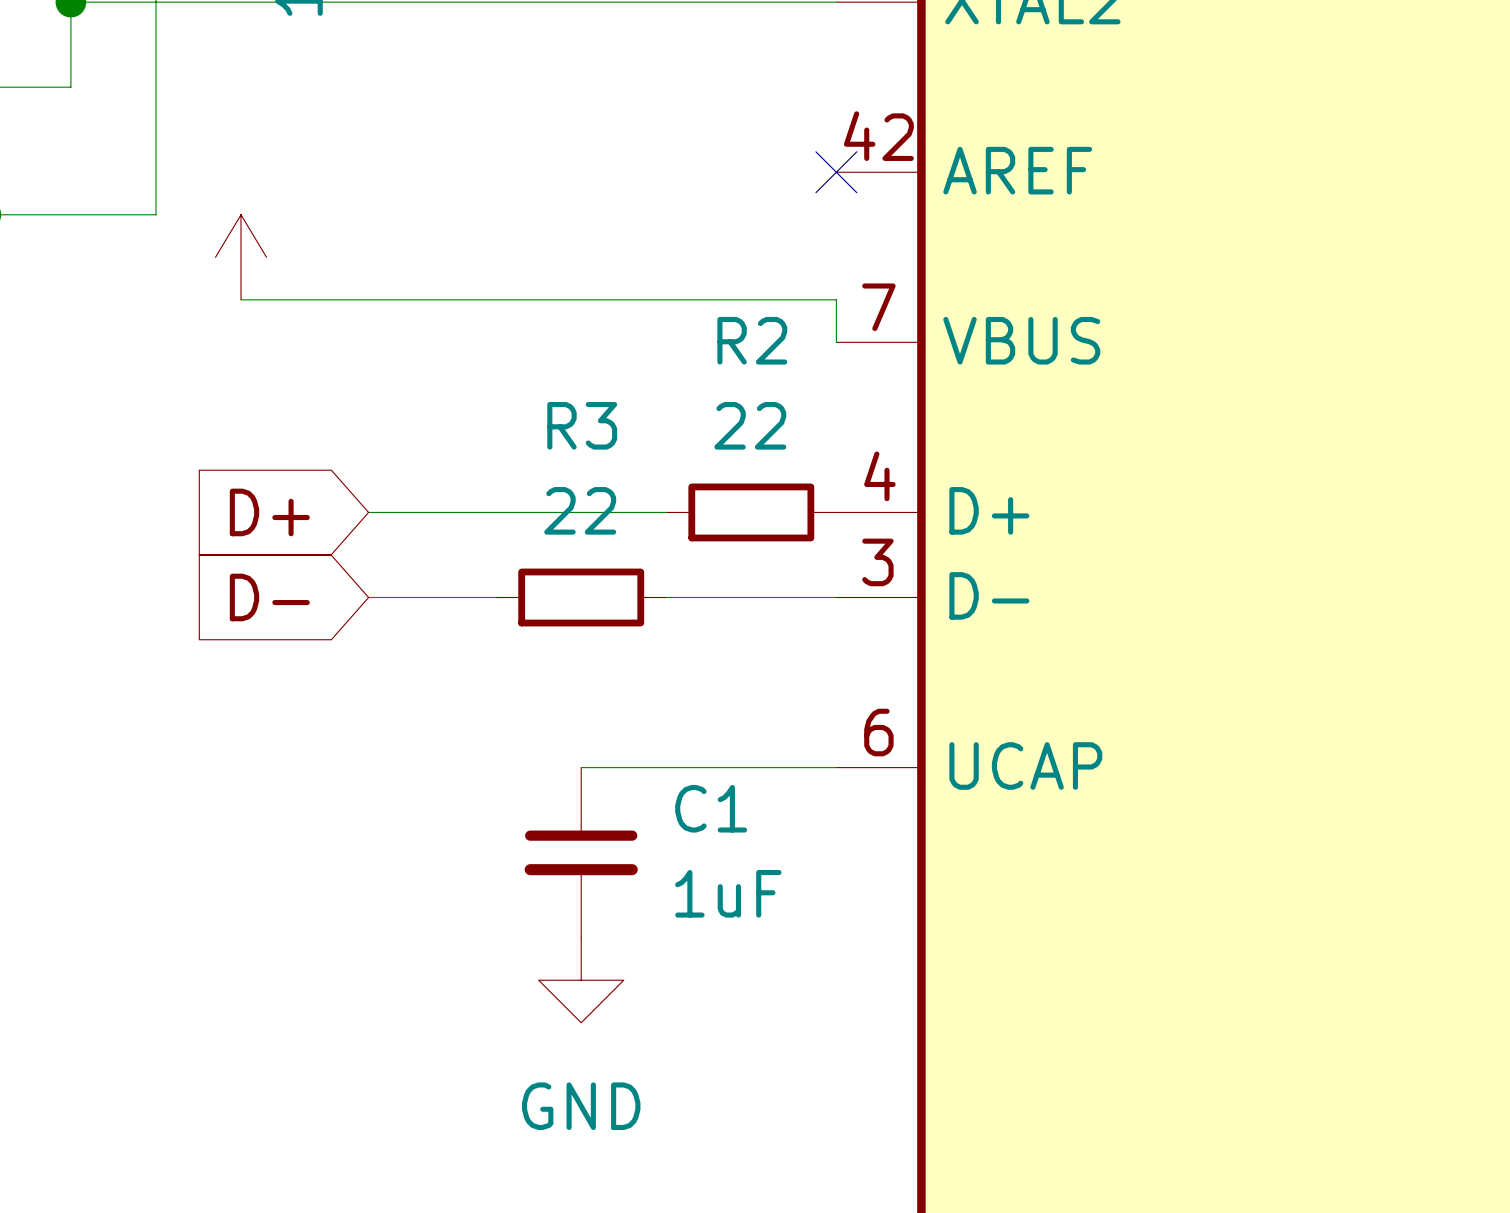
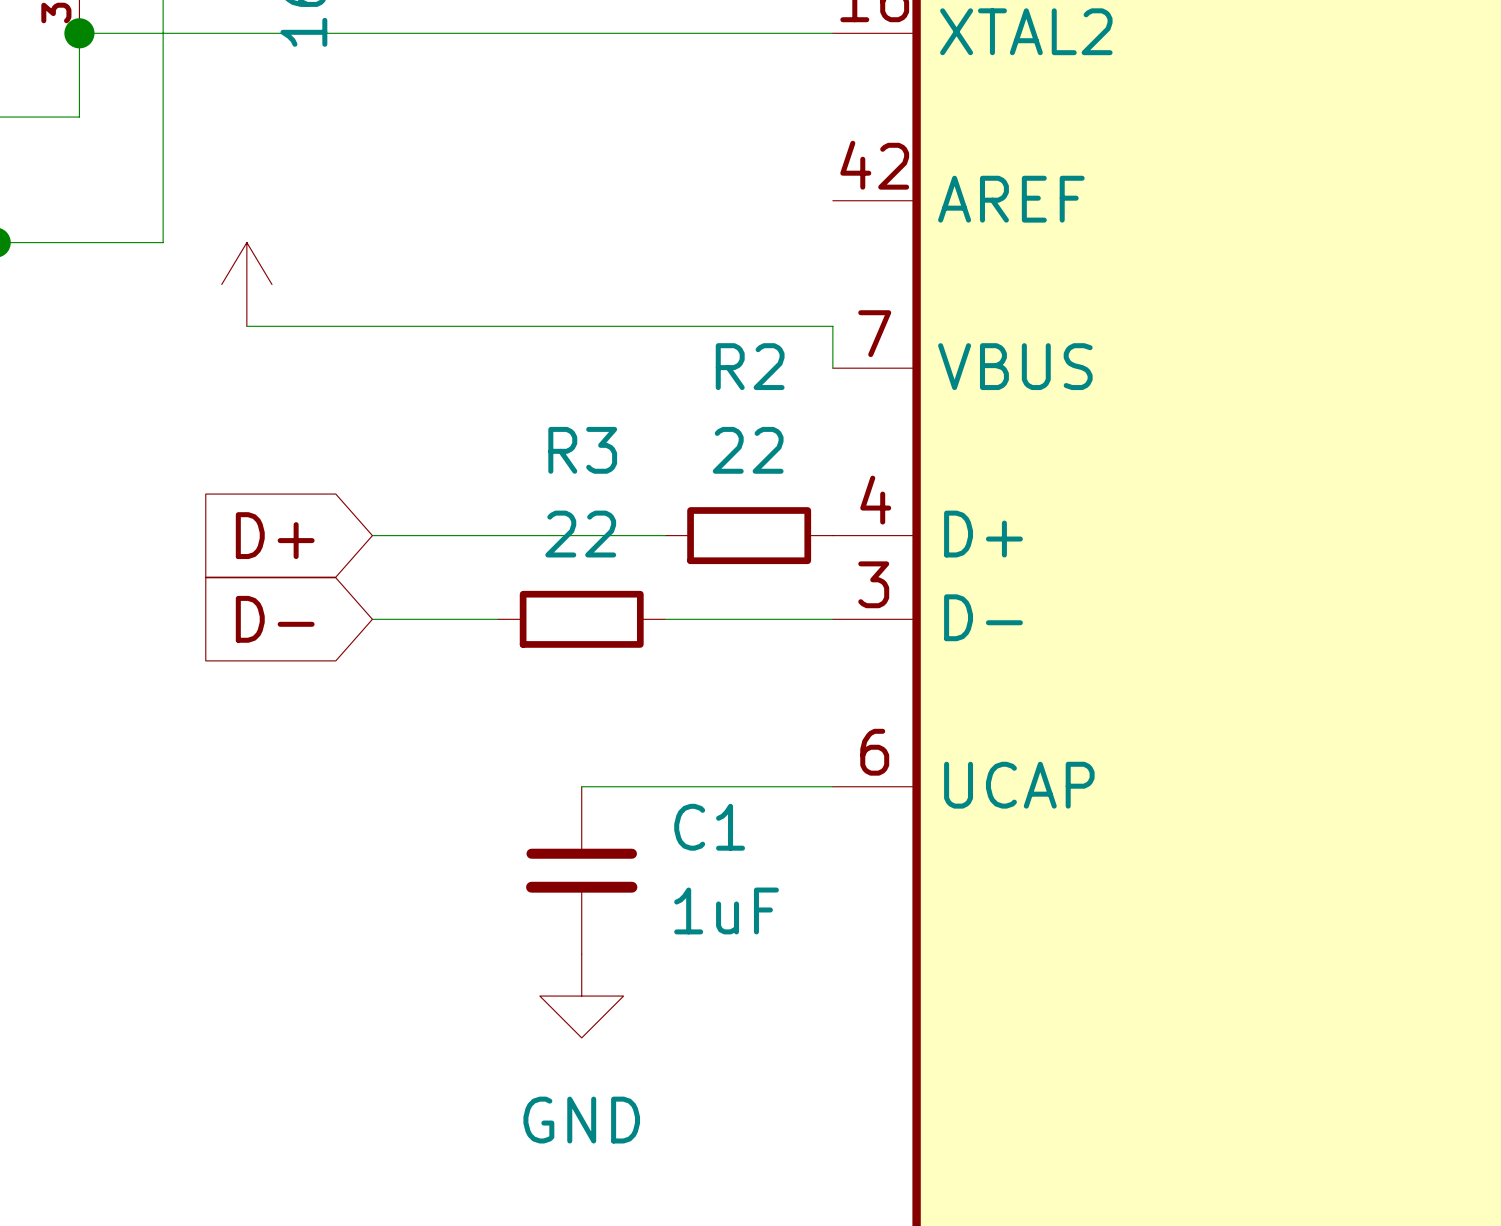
no-connect mark: (836, 172) -> none

